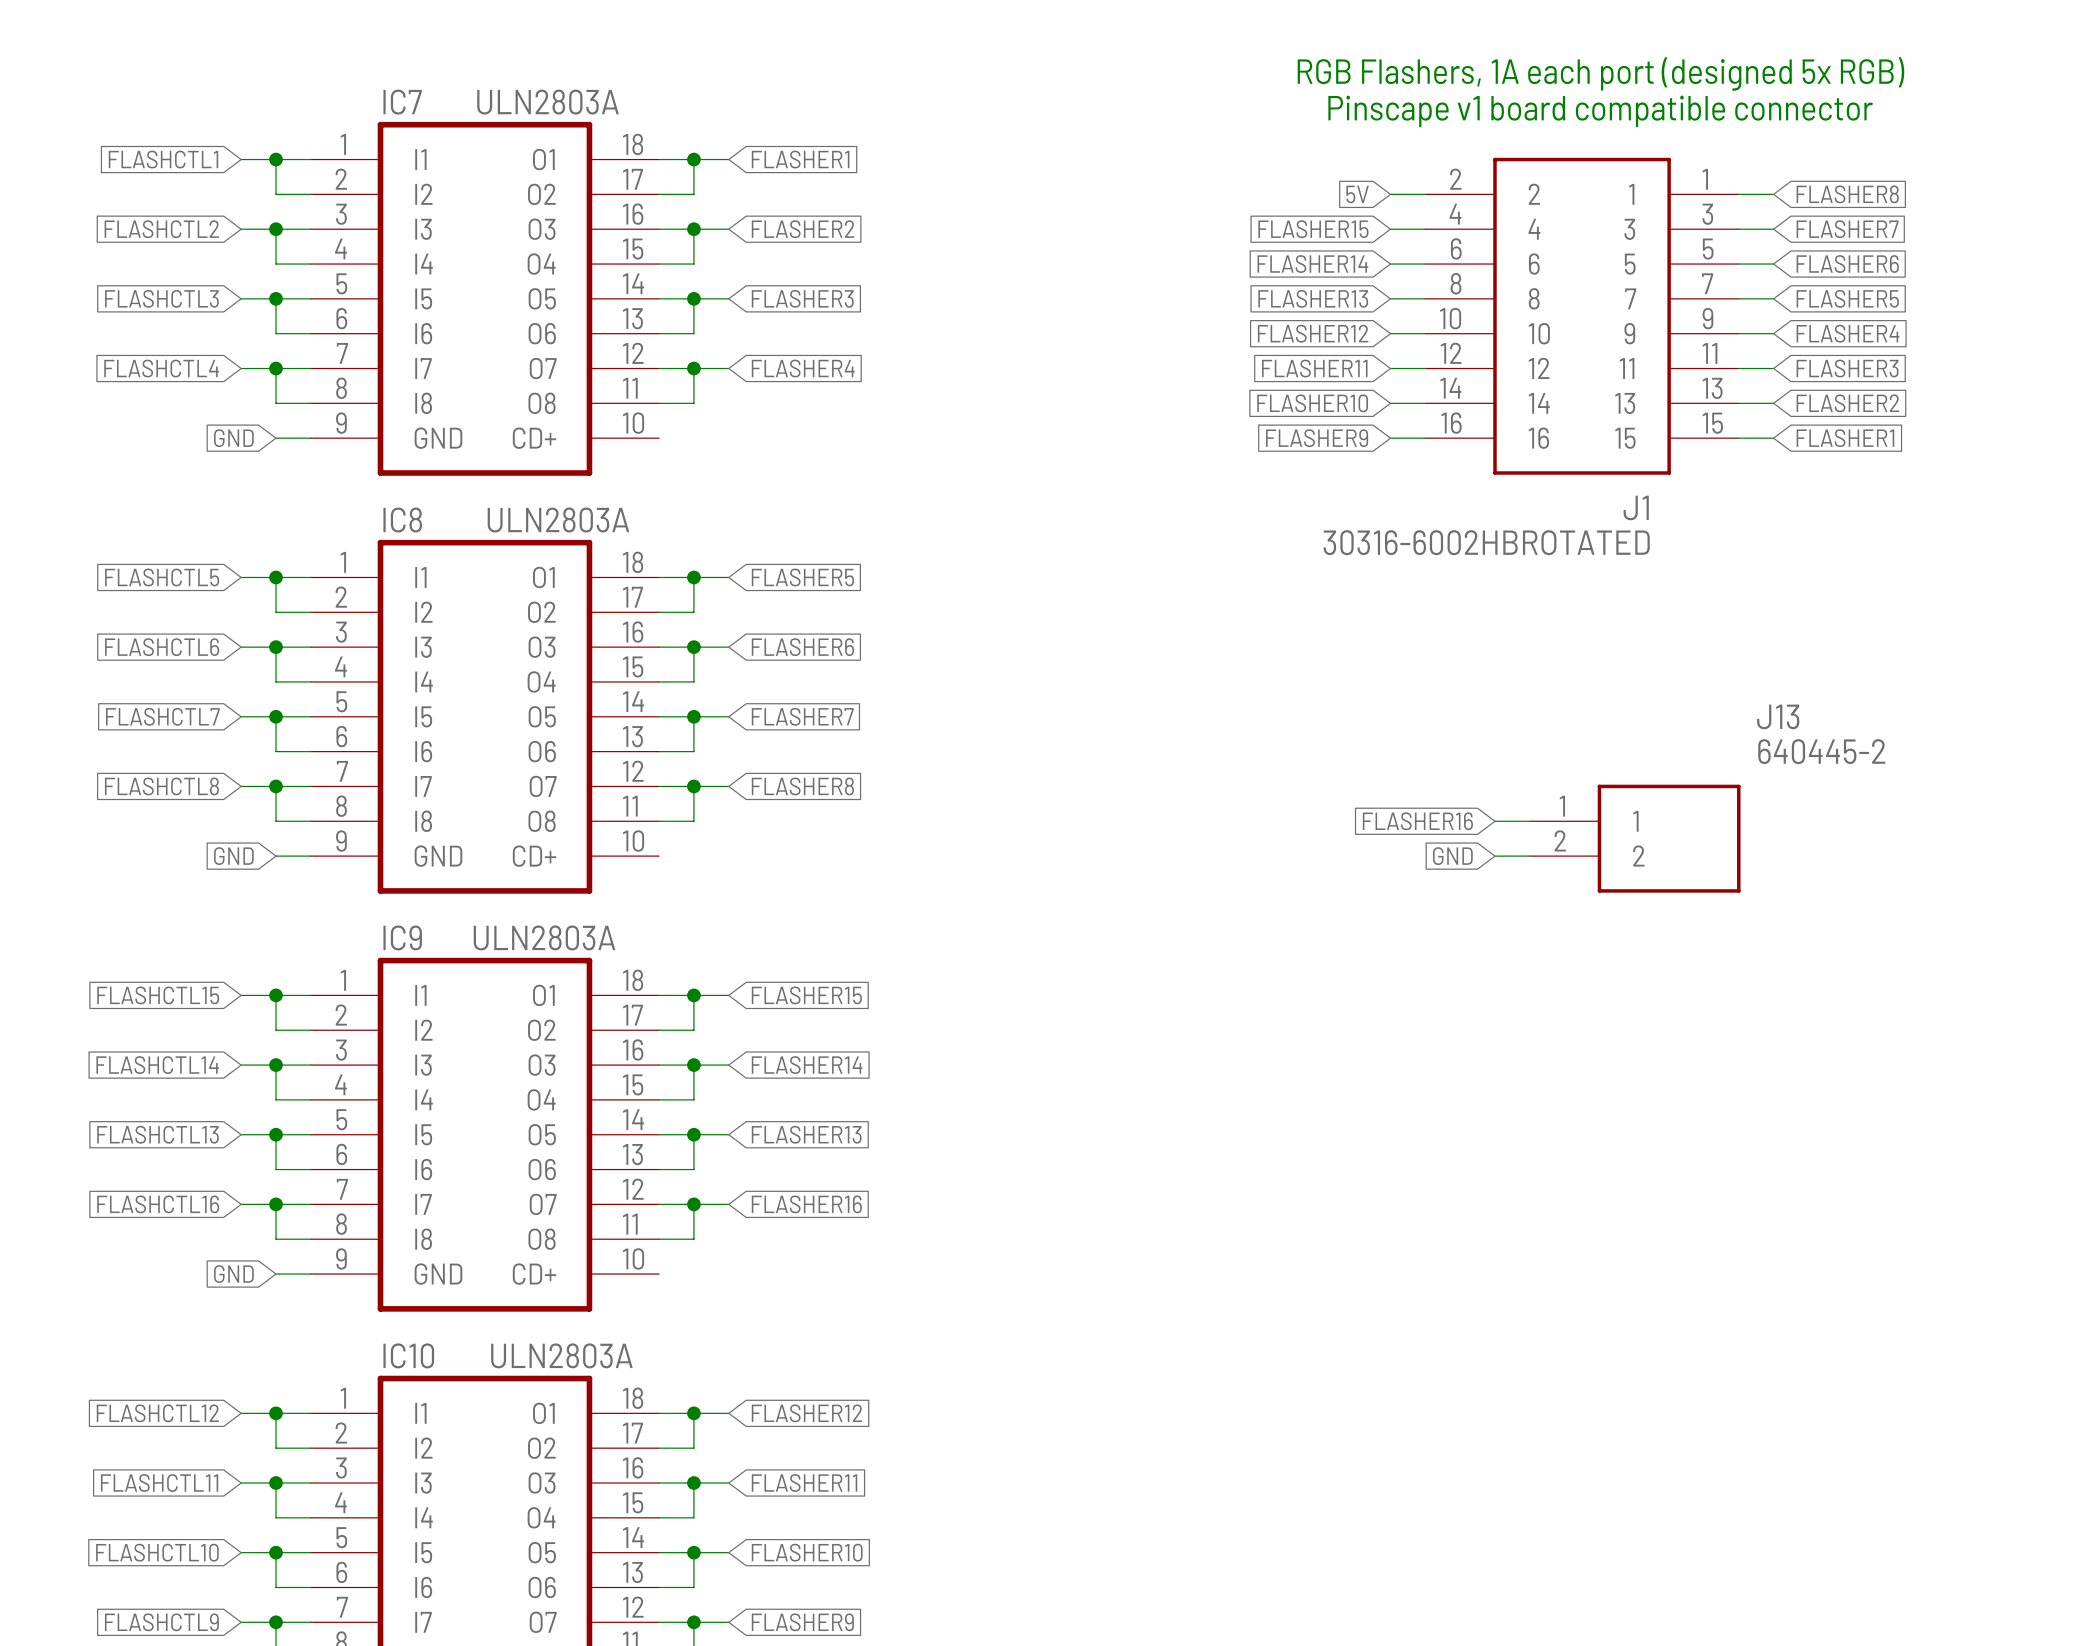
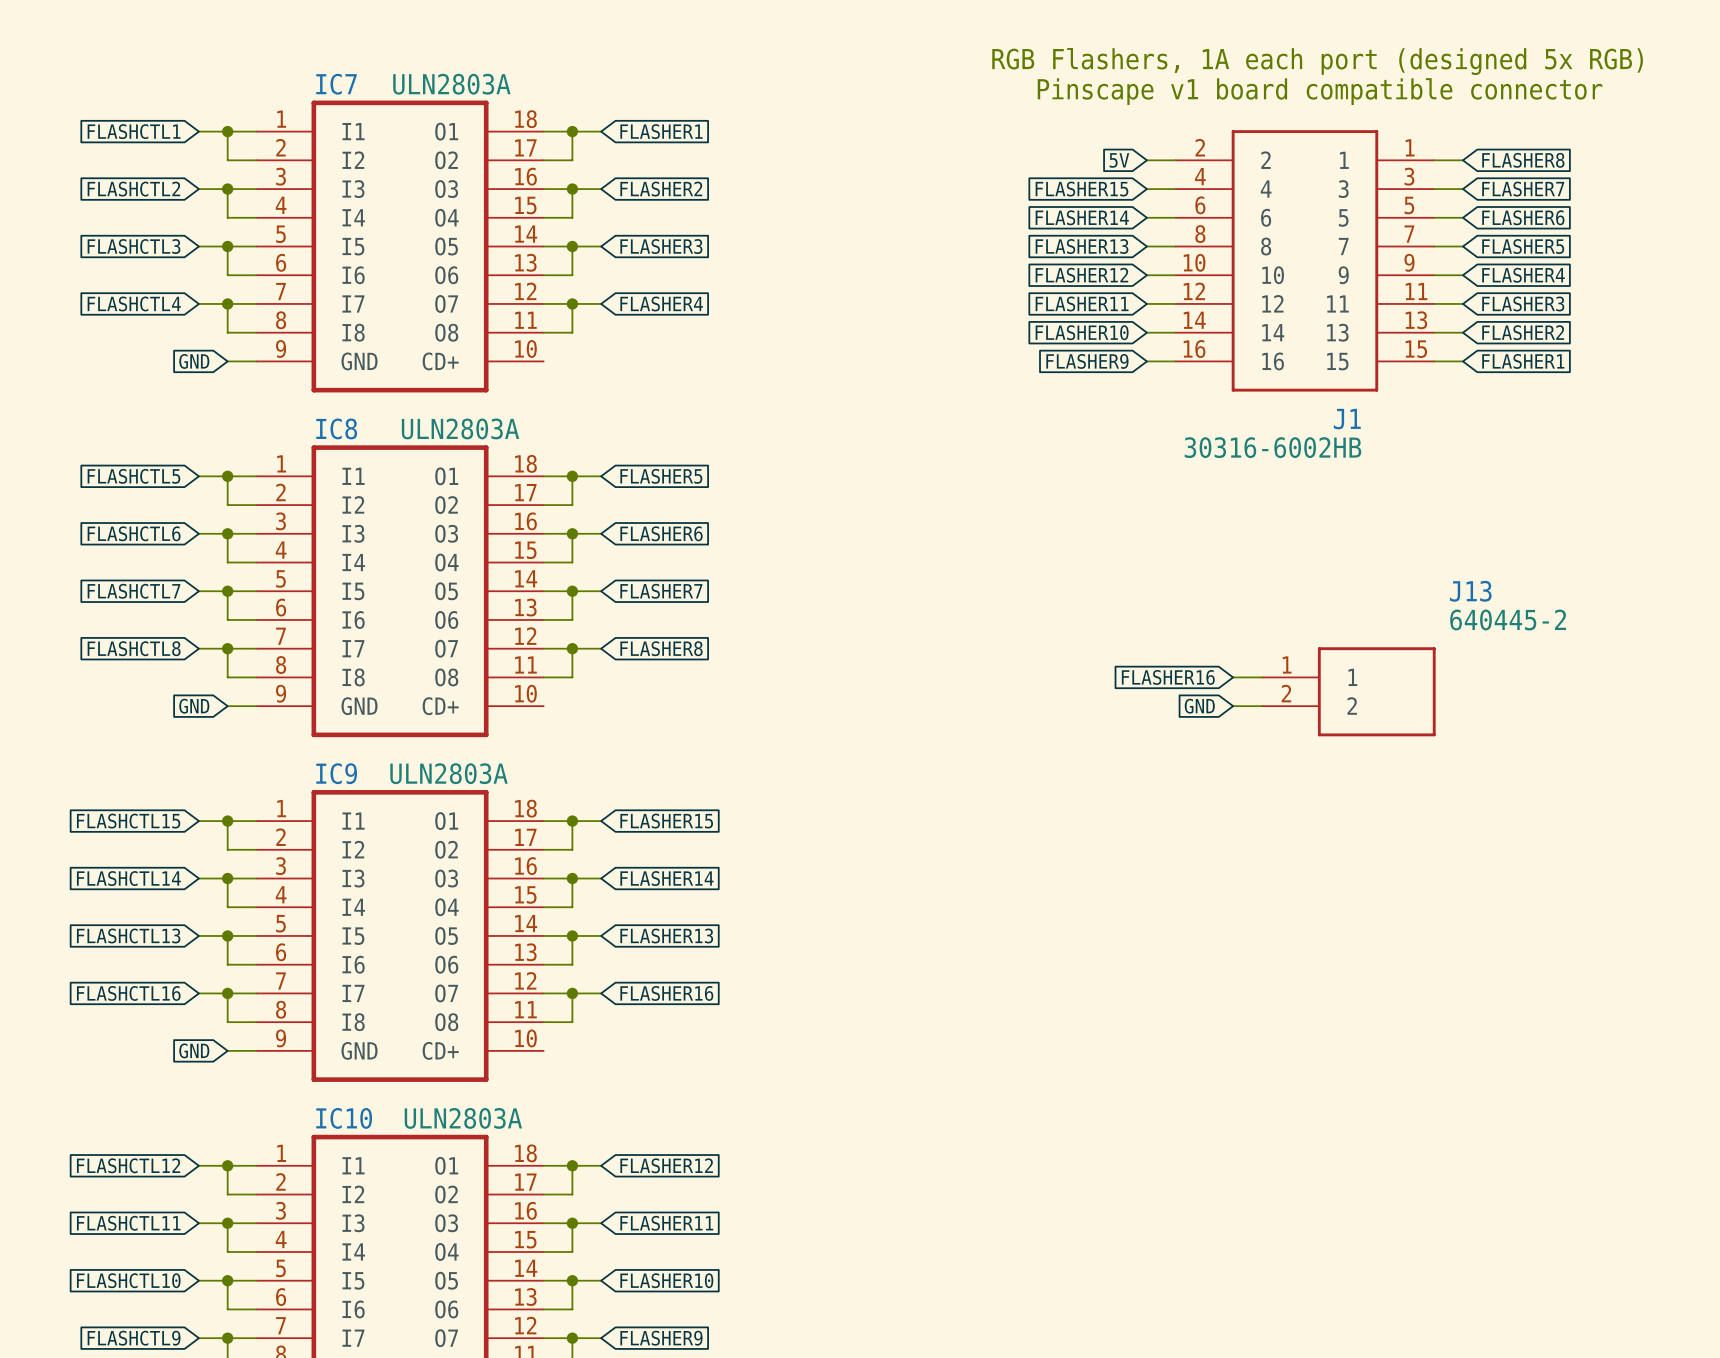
J1 value: 30316-6002HBROTATED (1486, 542) -> 30316-6002HB (1272, 447)

